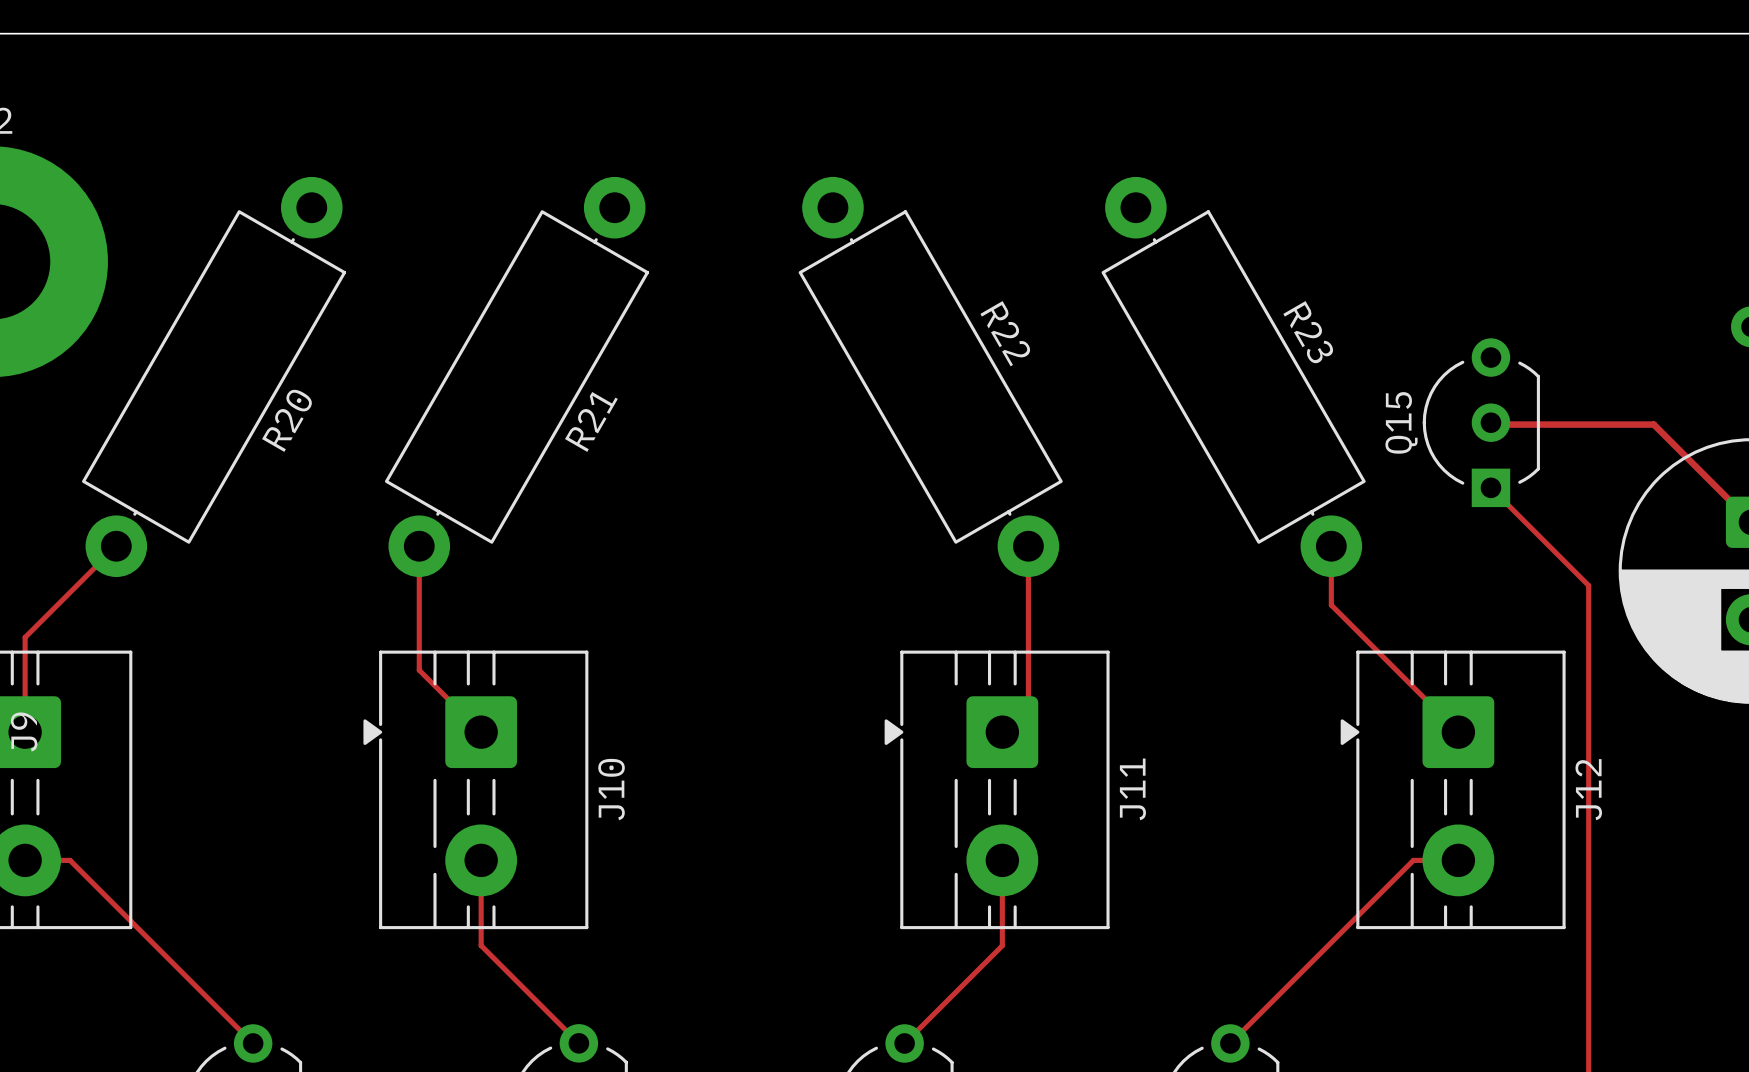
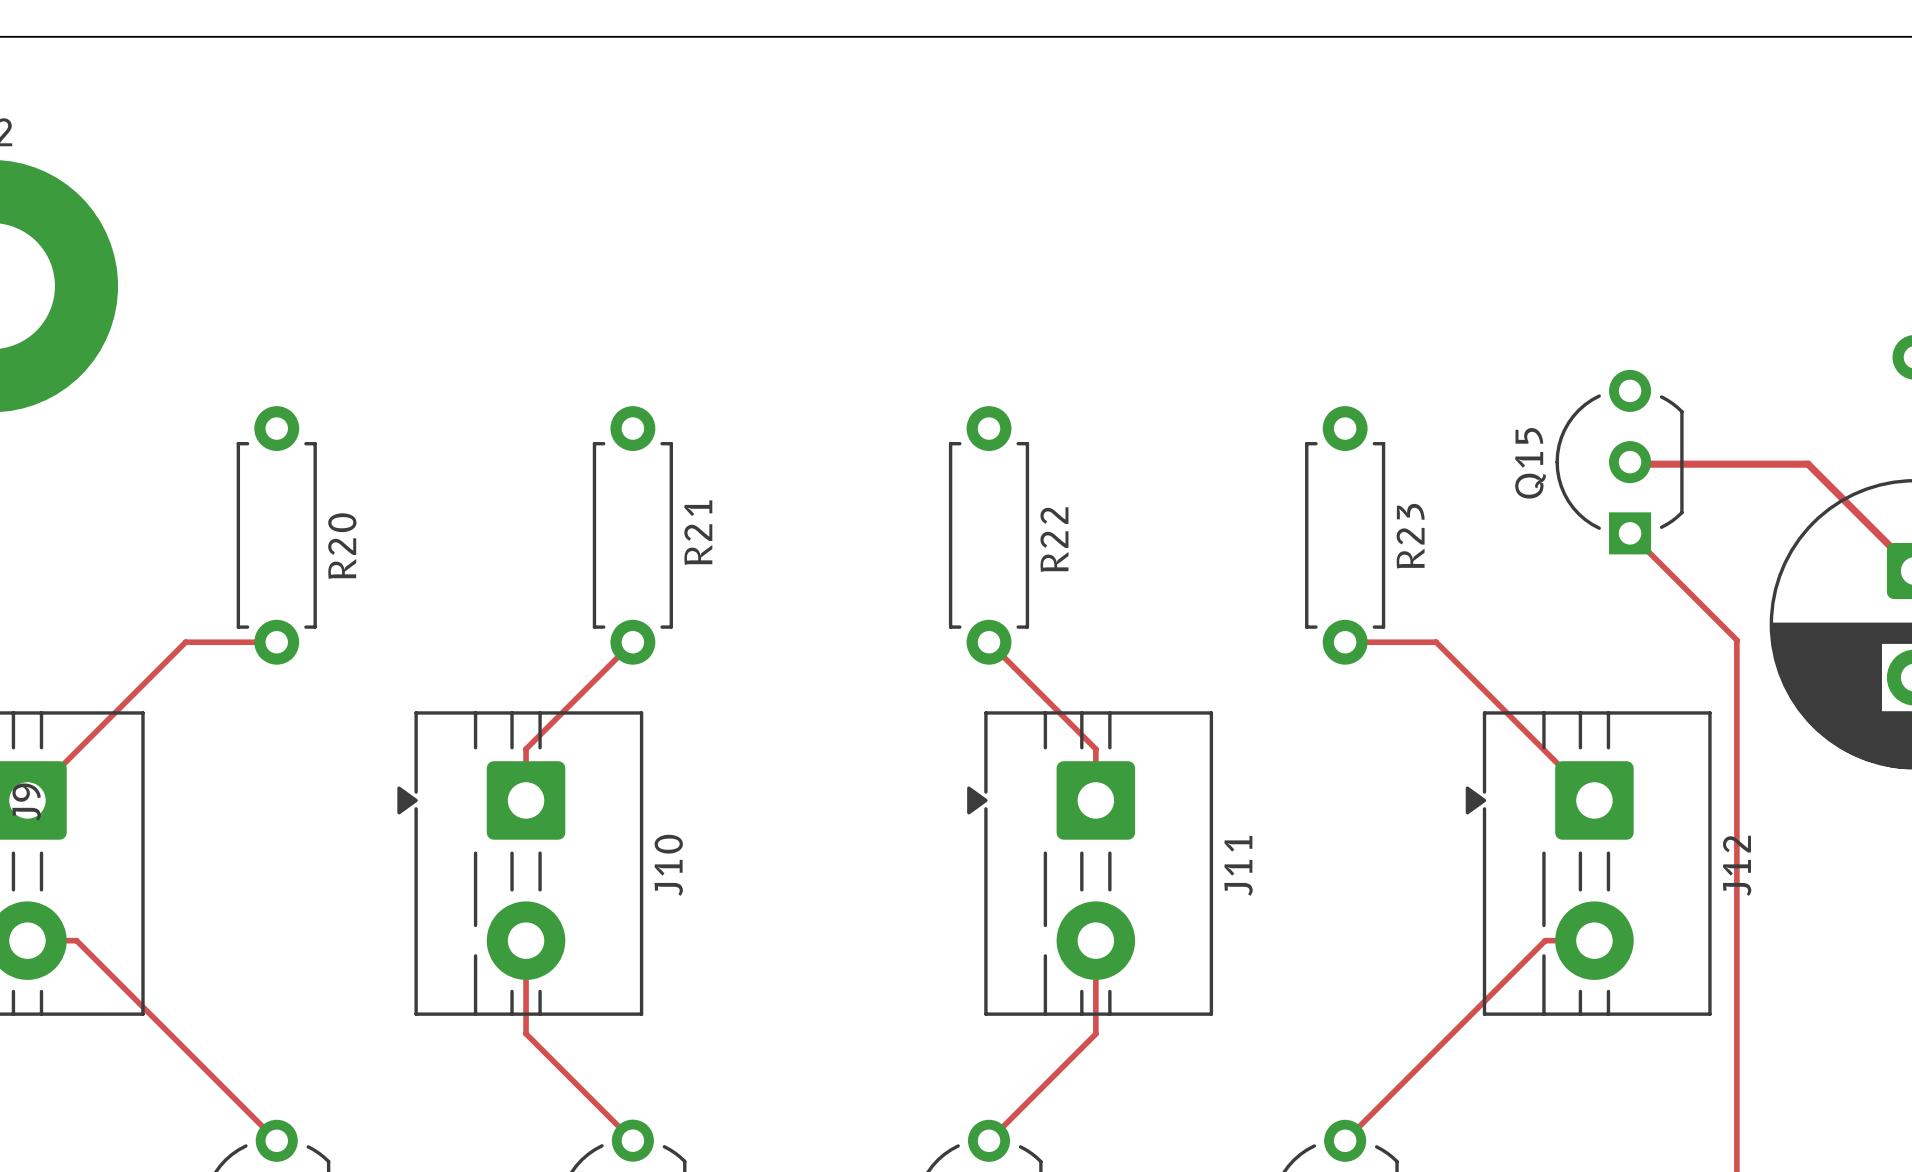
R20 footprint: [82, 176, 347, 578] -> [236, 406, 317, 665]
R21 footprint: [384, 176, 650, 578] -> [592, 406, 673, 665]
R22 footprint: [798, 176, 1063, 578] -> [948, 406, 1030, 665]
R23 footprint: [1101, 176, 1366, 578] -> [1305, 406, 1386, 665]
track: (116, 546) (25, 637) (25, 732) -> (276, 642) (185, 642) (27, 800)
track: (419, 546) (419, 670) (481, 732) -> (632, 642) (526, 749) (526, 800)
track: (1028, 546) (1028, 706) (1002, 732) -> (989, 642) (1095, 749) (1095, 800)
track: (1331, 546) (1331, 605) -> (1345, 642) (1436, 642) (1455, 661)

